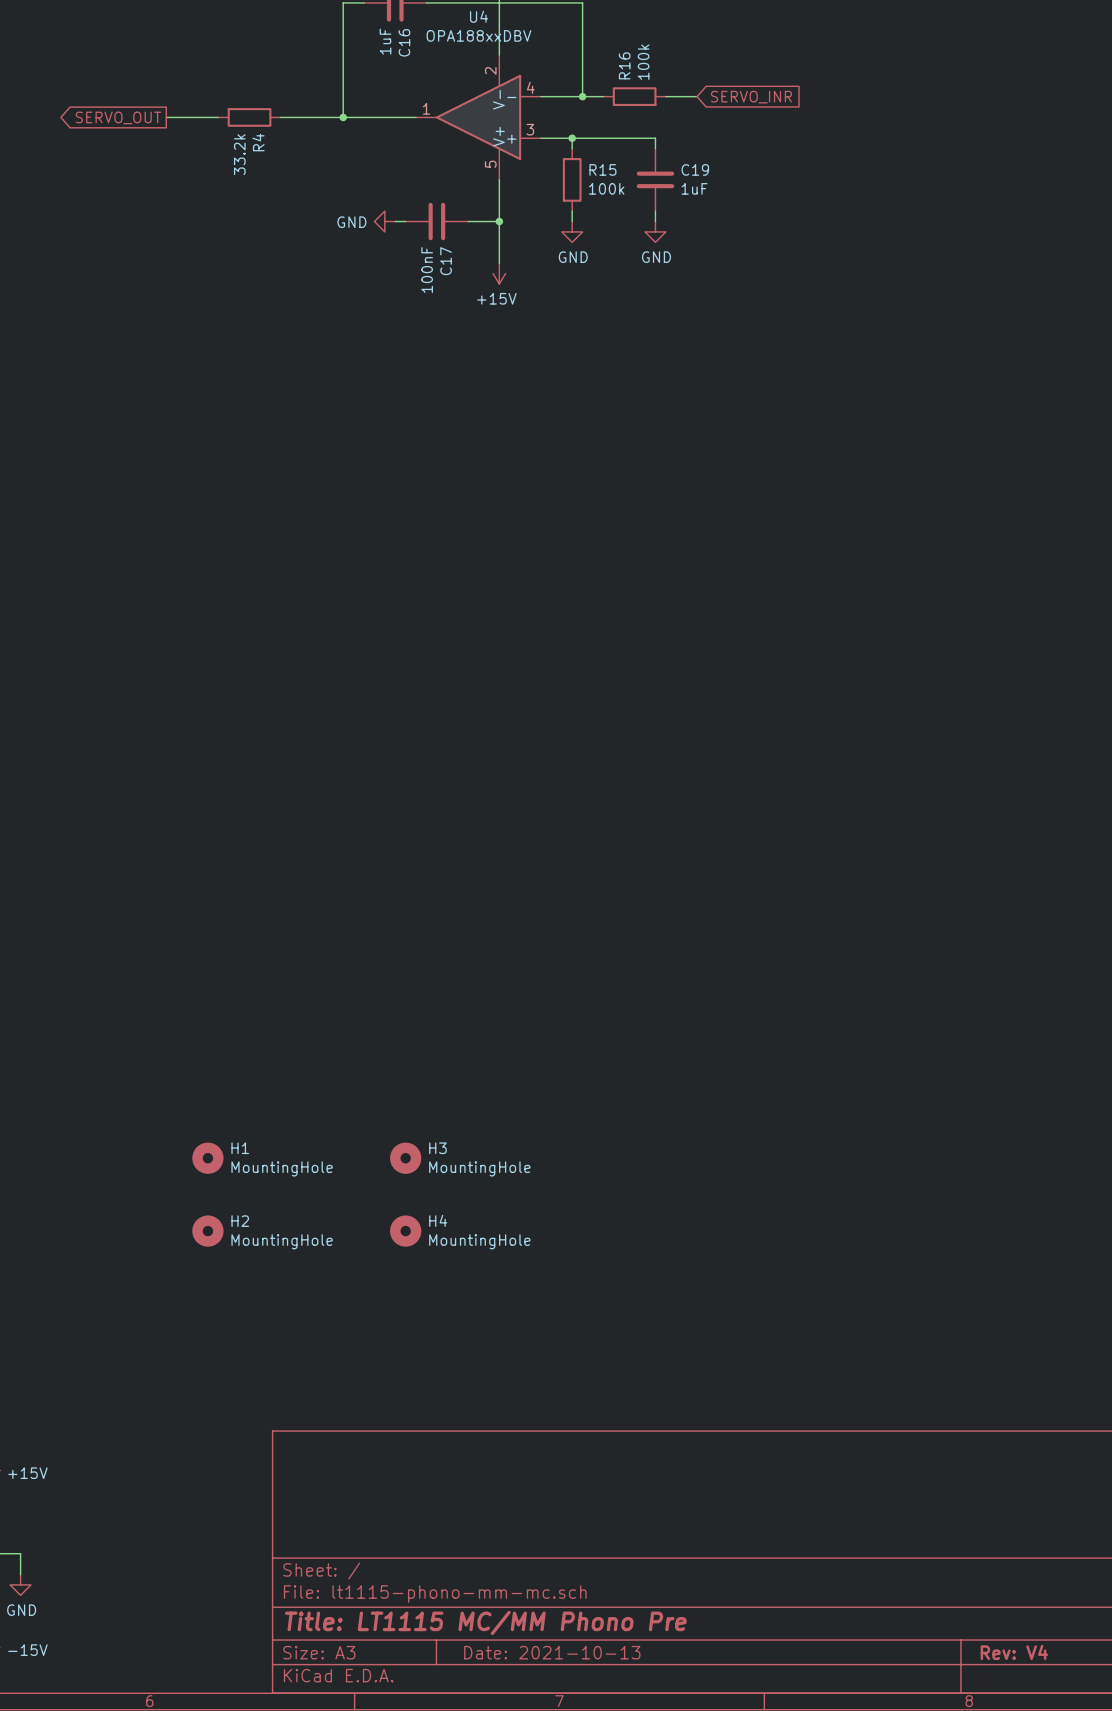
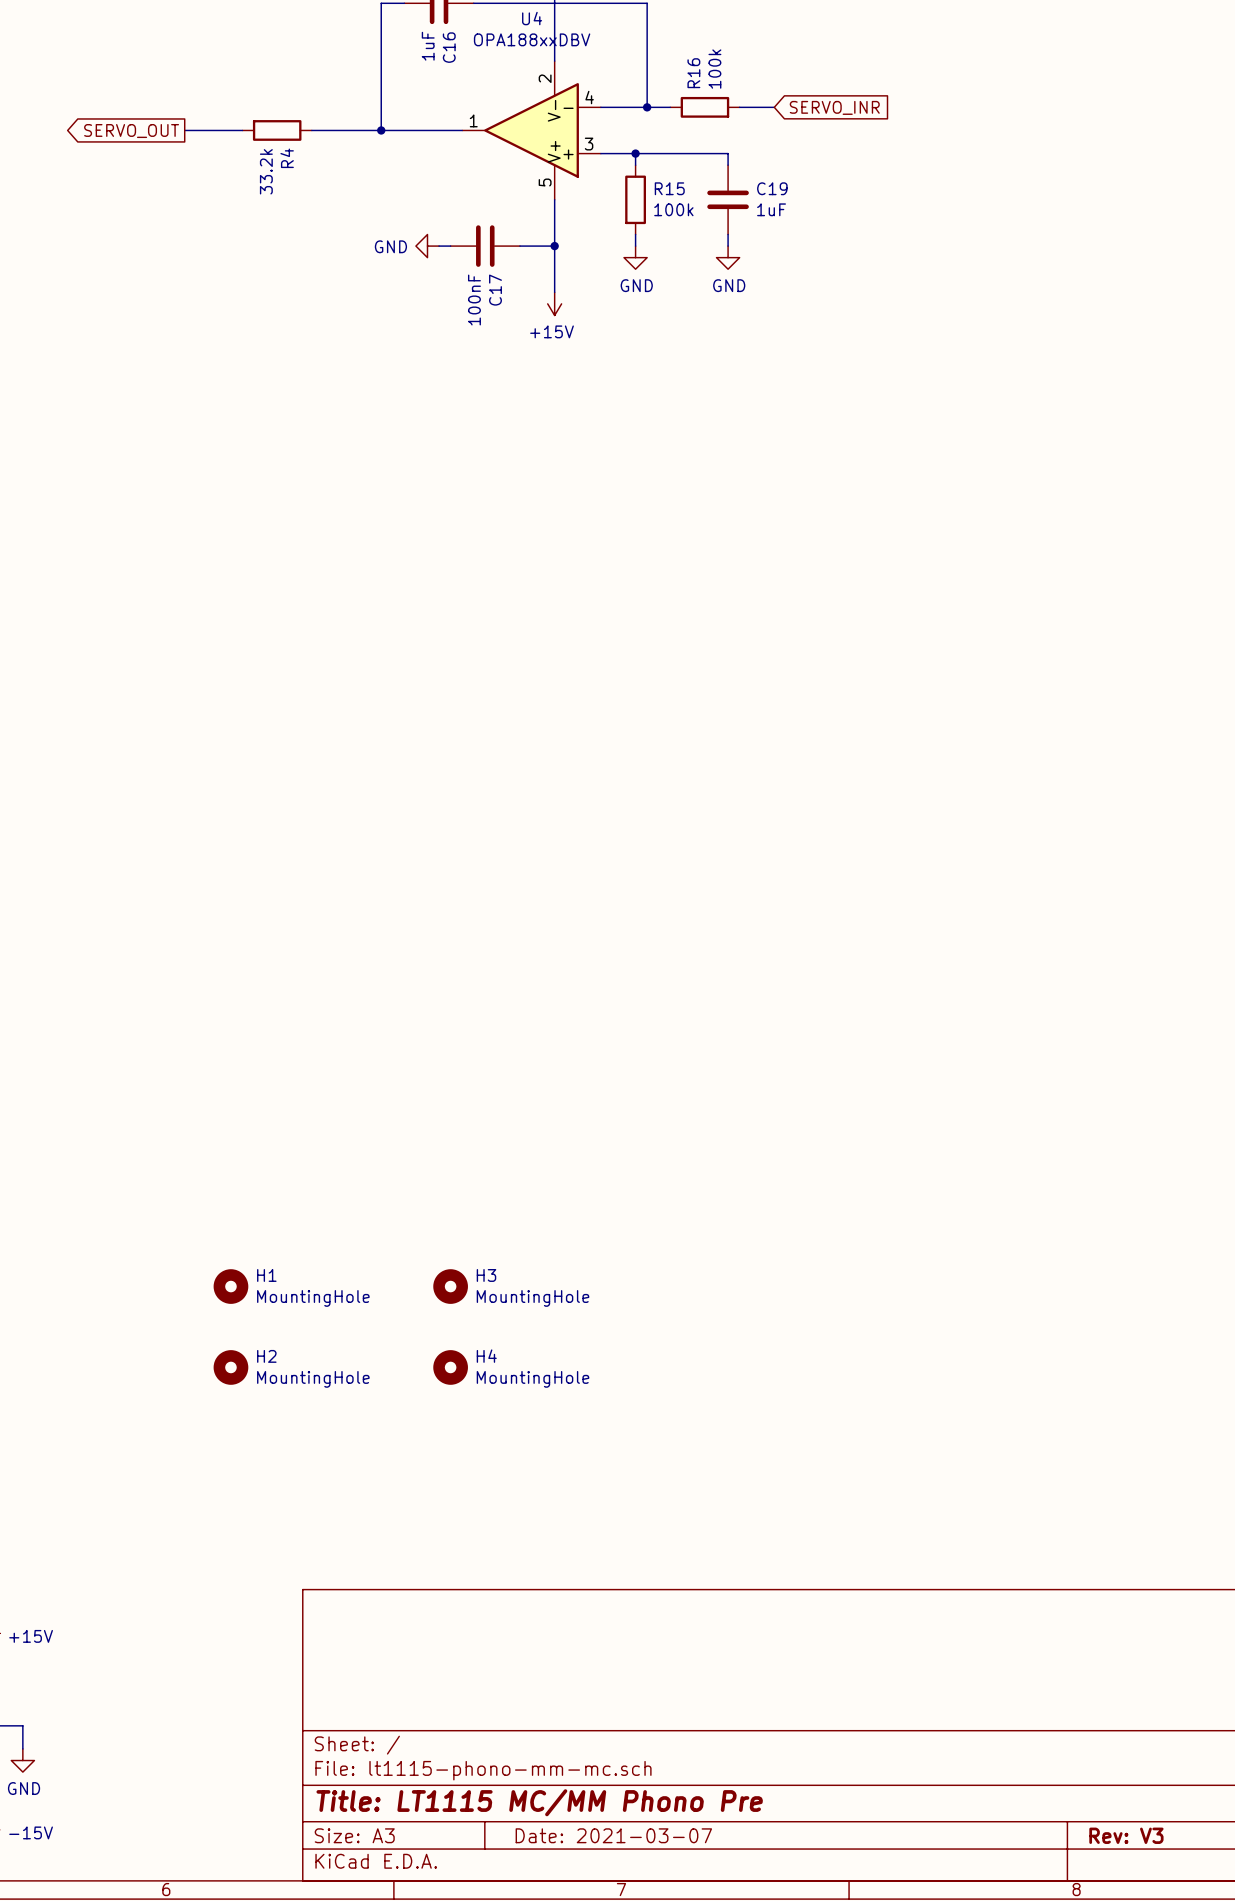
title block: Date: 2021-10-13 (552, 1652) -> Date: 2021-03-07 (613, 1835)
title block: Rev: V4 (1014, 1652) -> Rev: V3 (1126, 1835)

